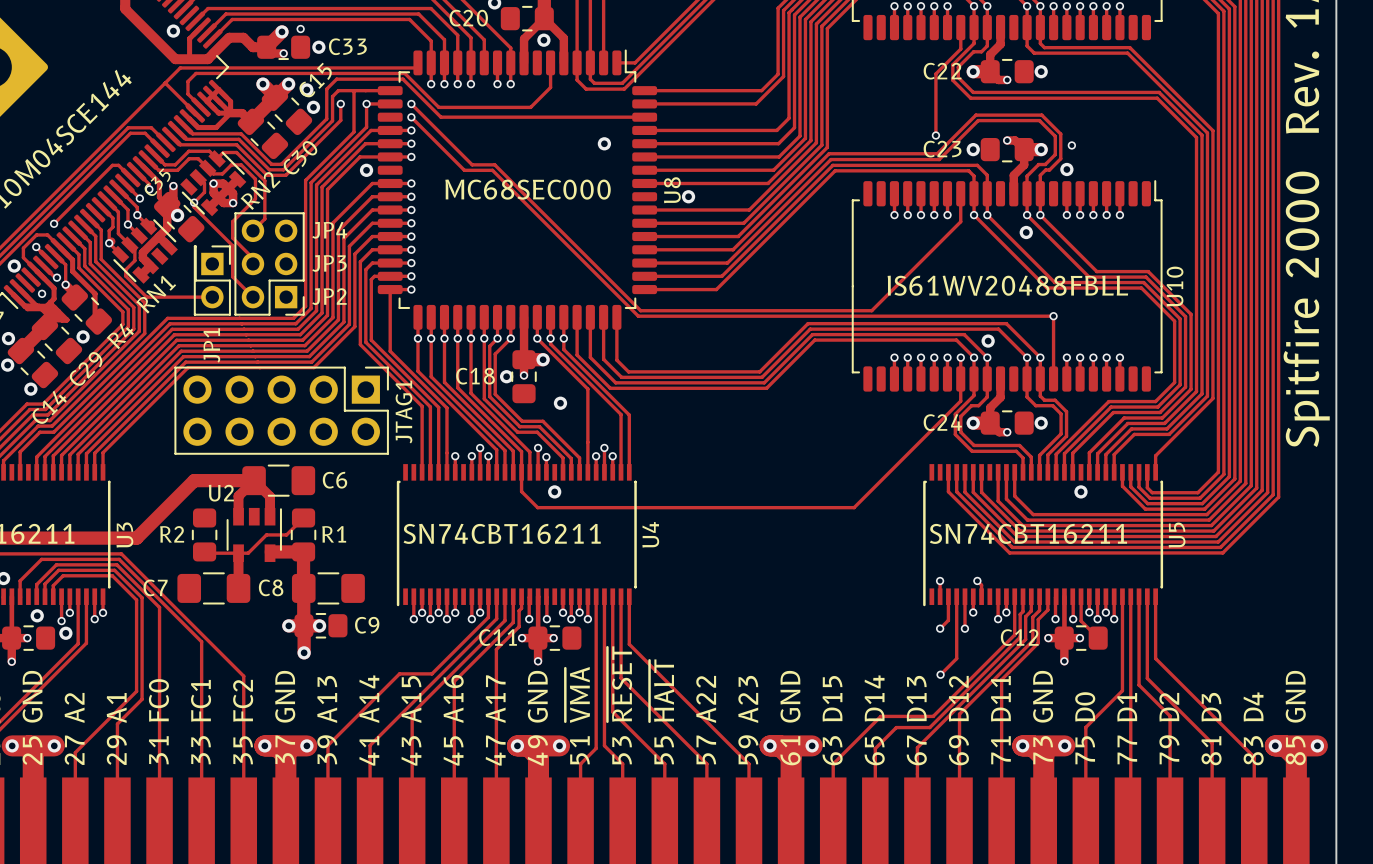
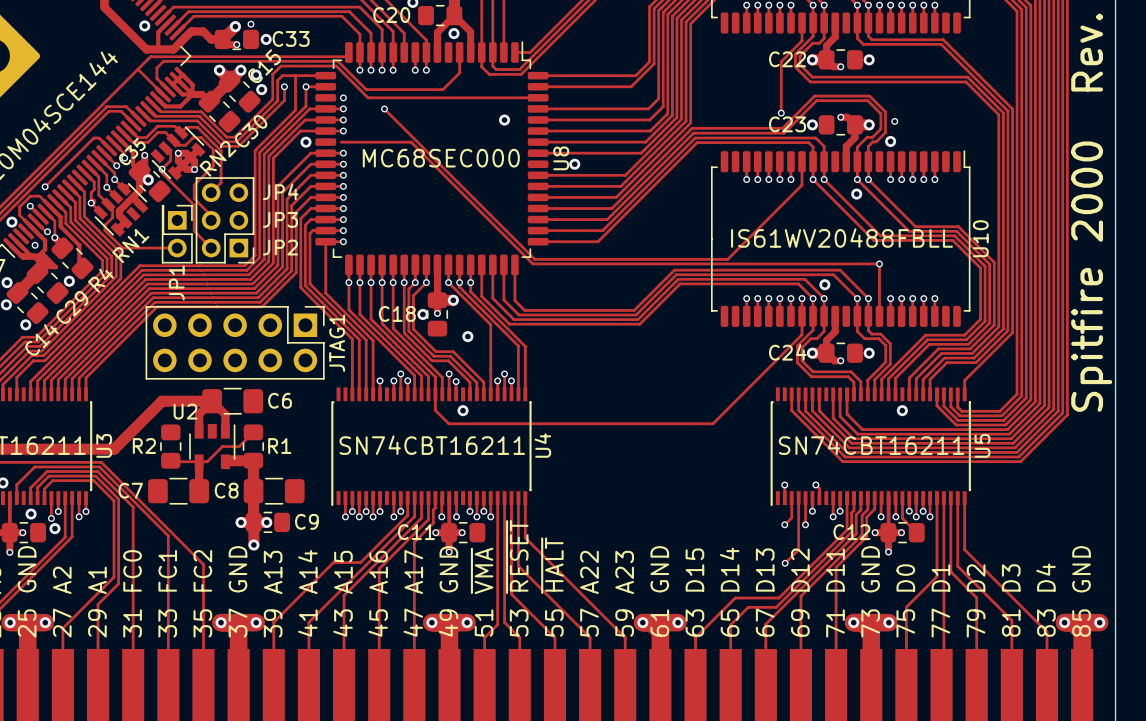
track: (411, 104) (472, 164) (494, 164) -> (383, 108) (413, 137)
via position: (411, 104) -> (384, 108)
track: (411, 117) (464, 170) -> (341, 142) (387, 142)

